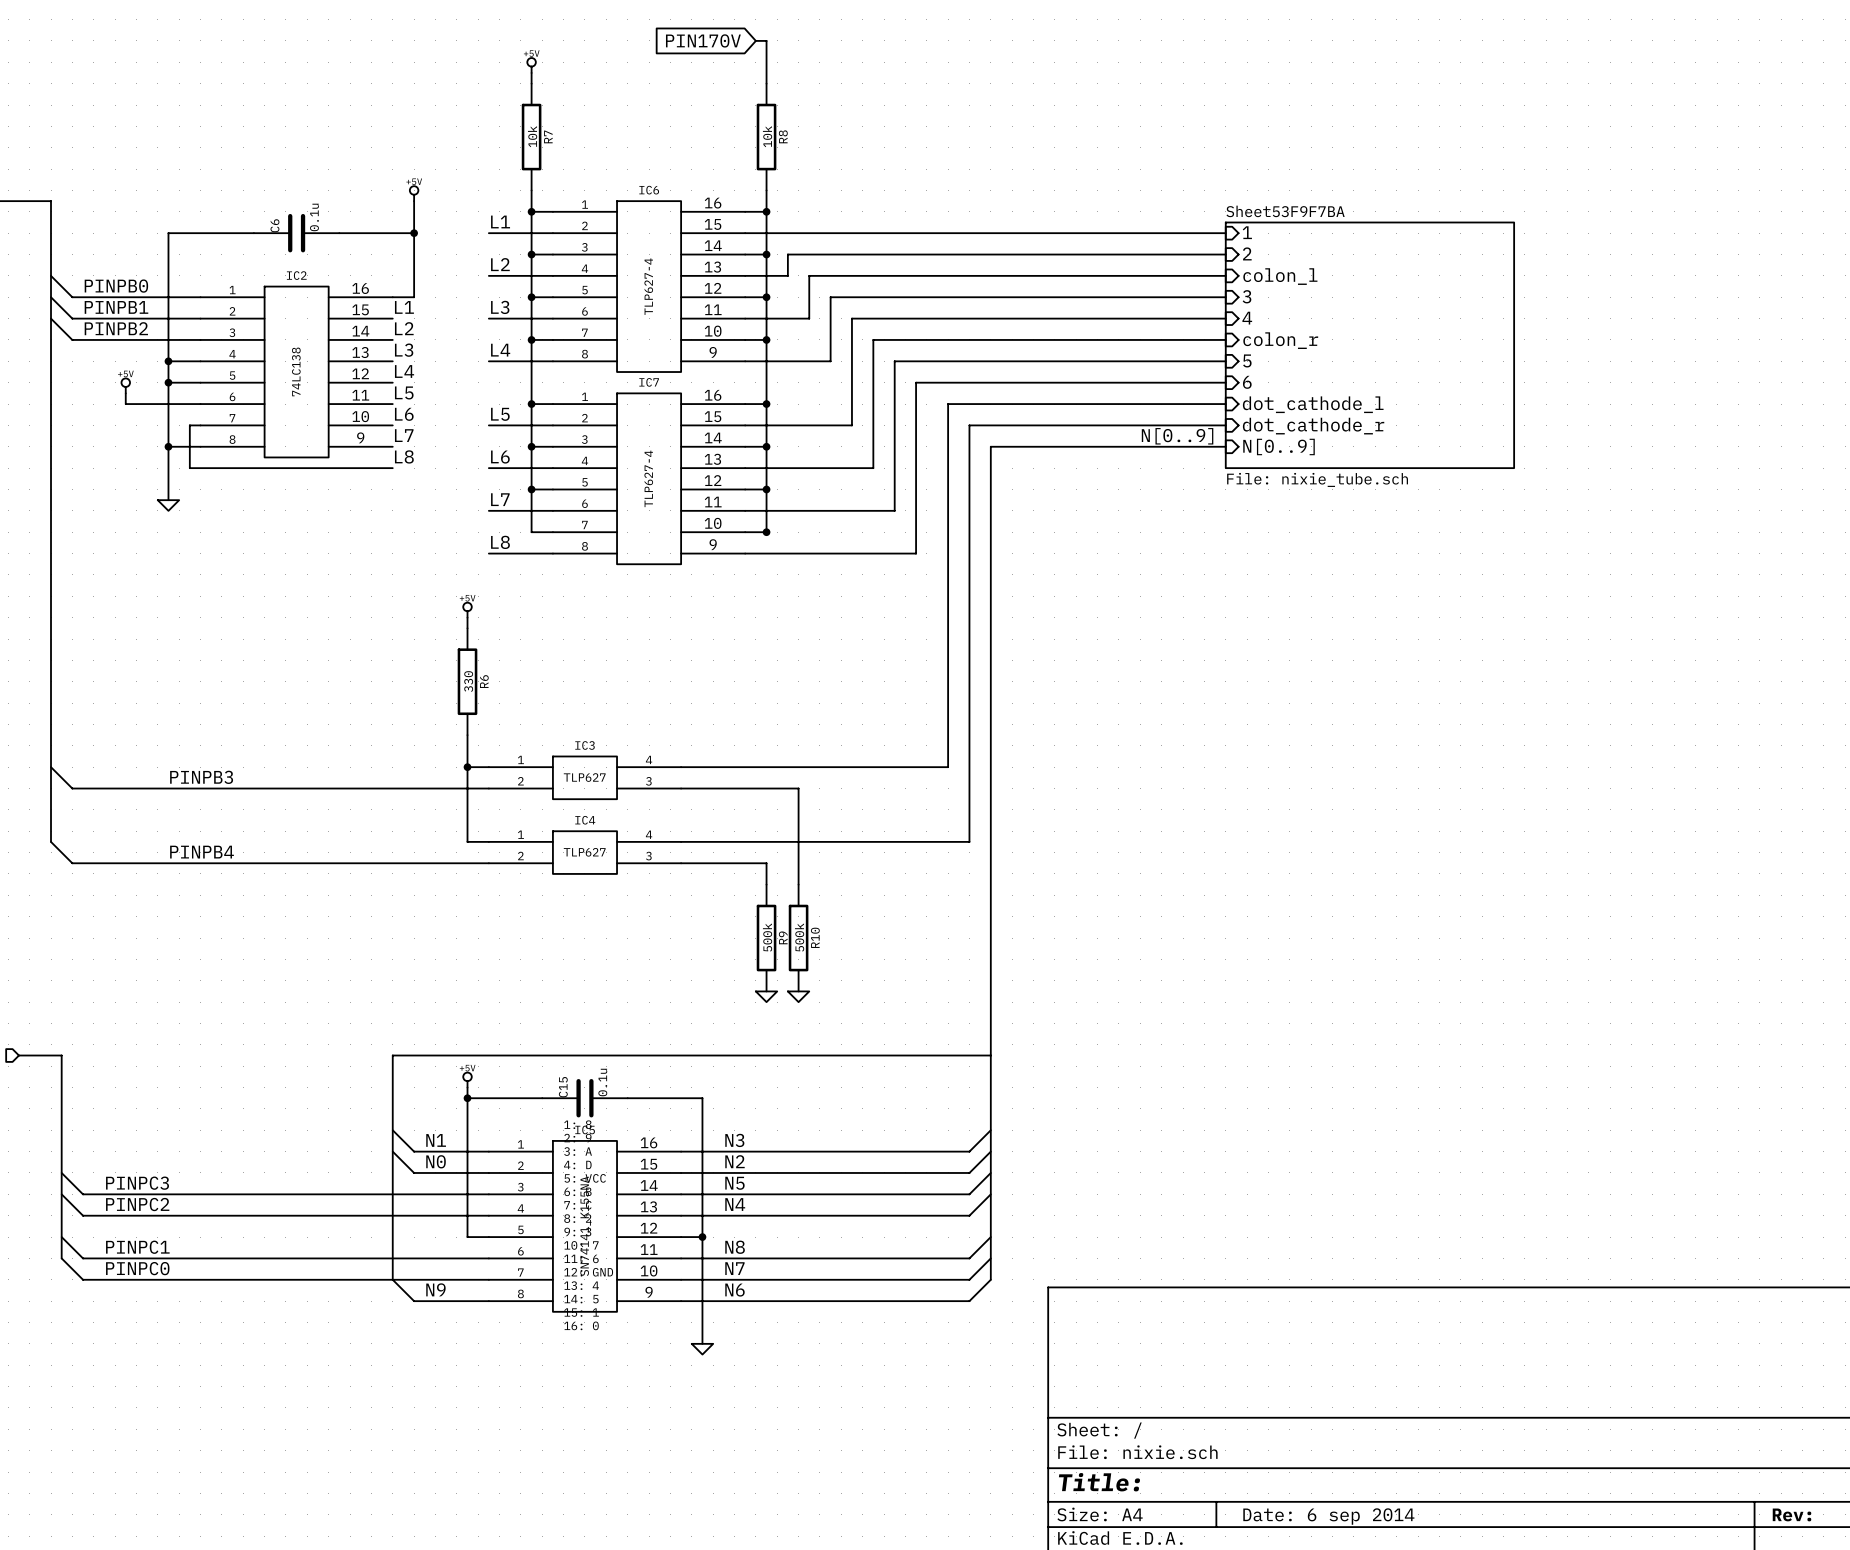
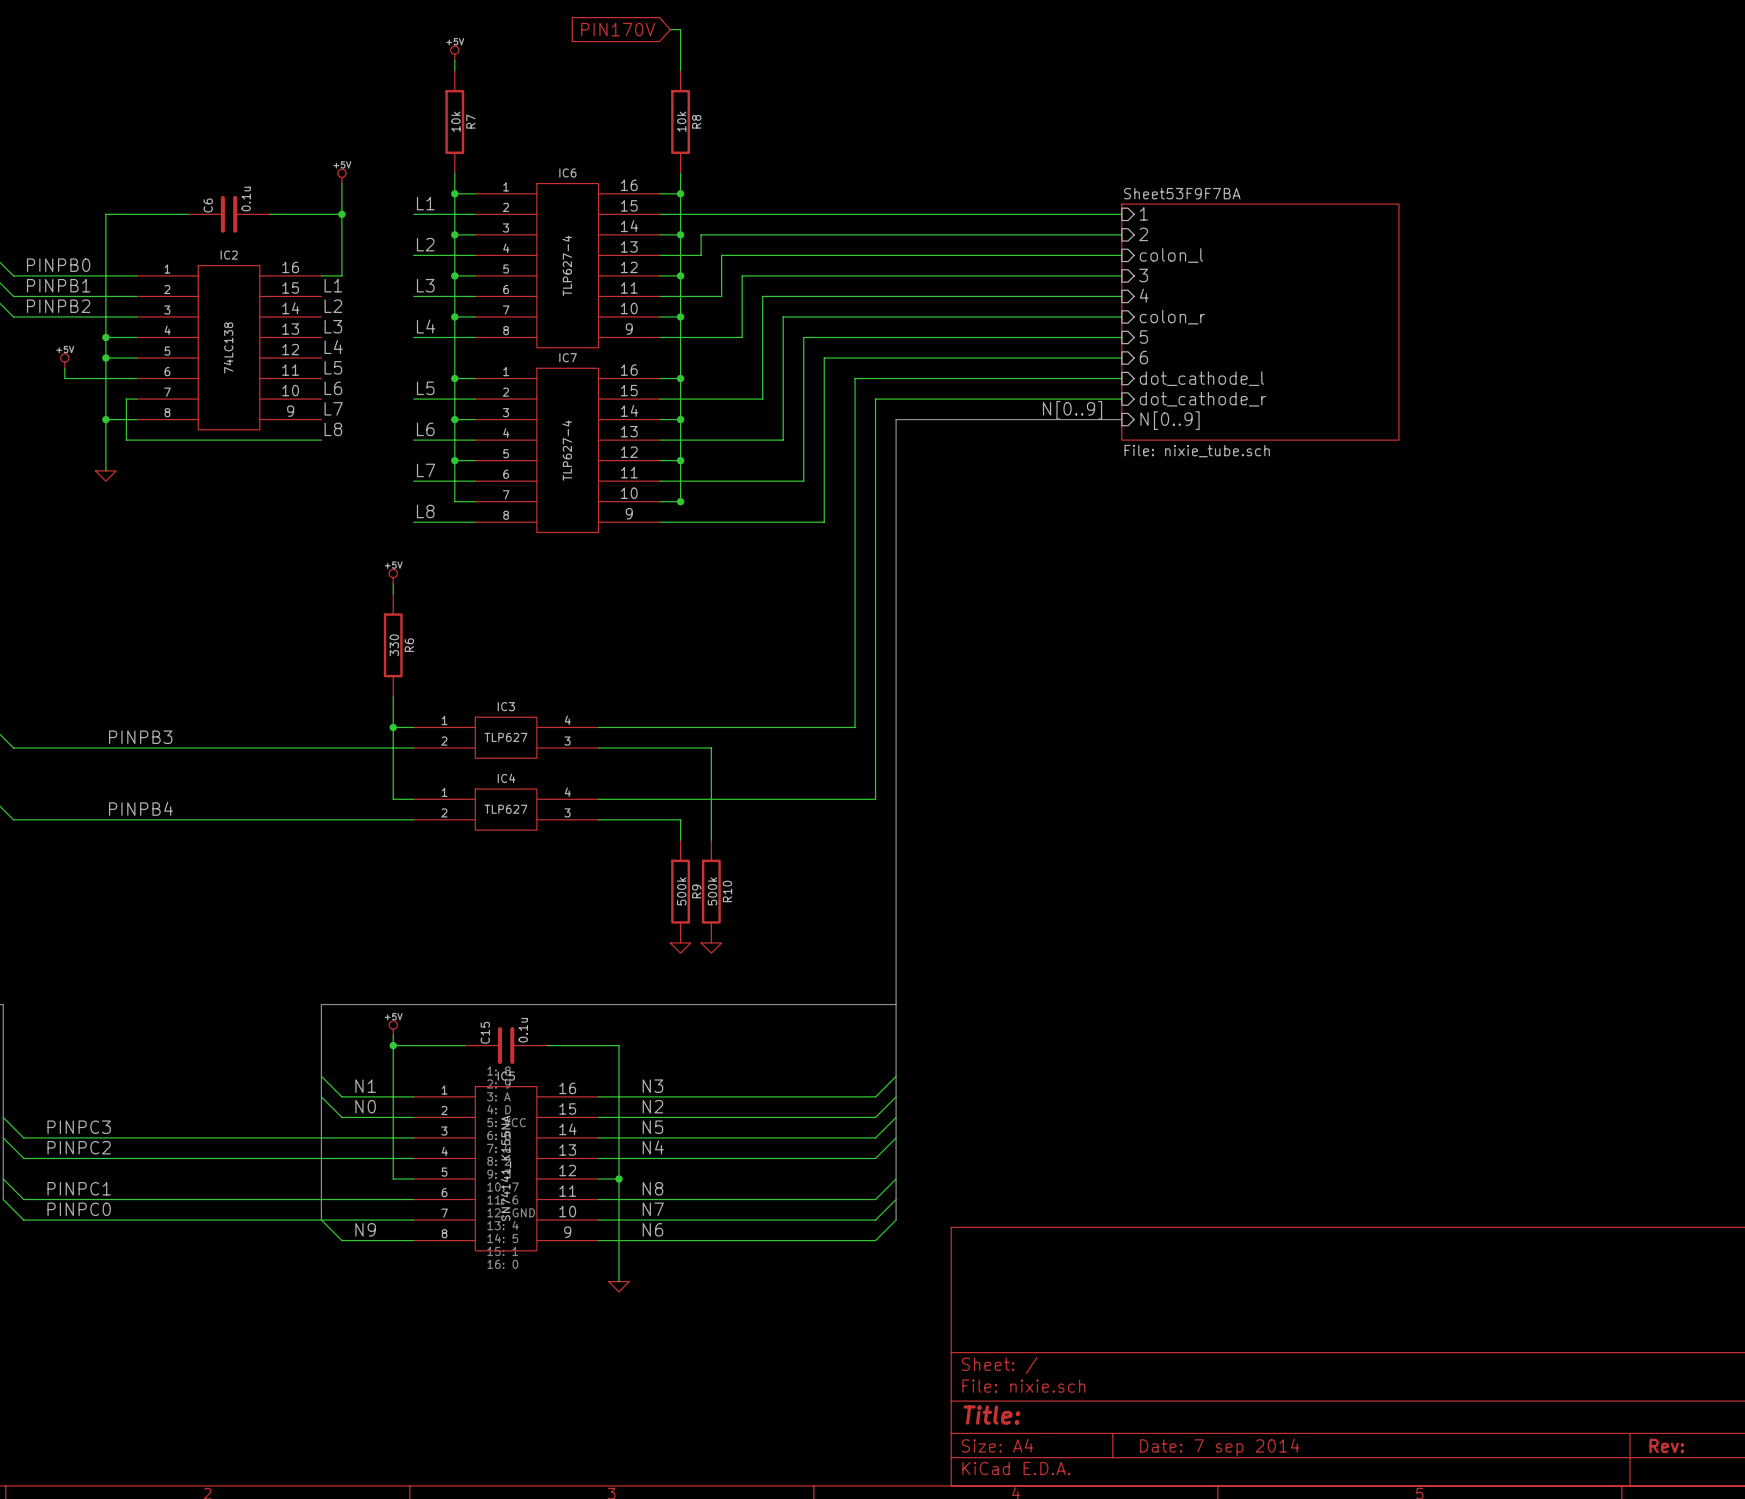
title block: Date: 6 sep 2014 (1328, 1516) -> Date: 7 sep 2014 (1219, 1447)

